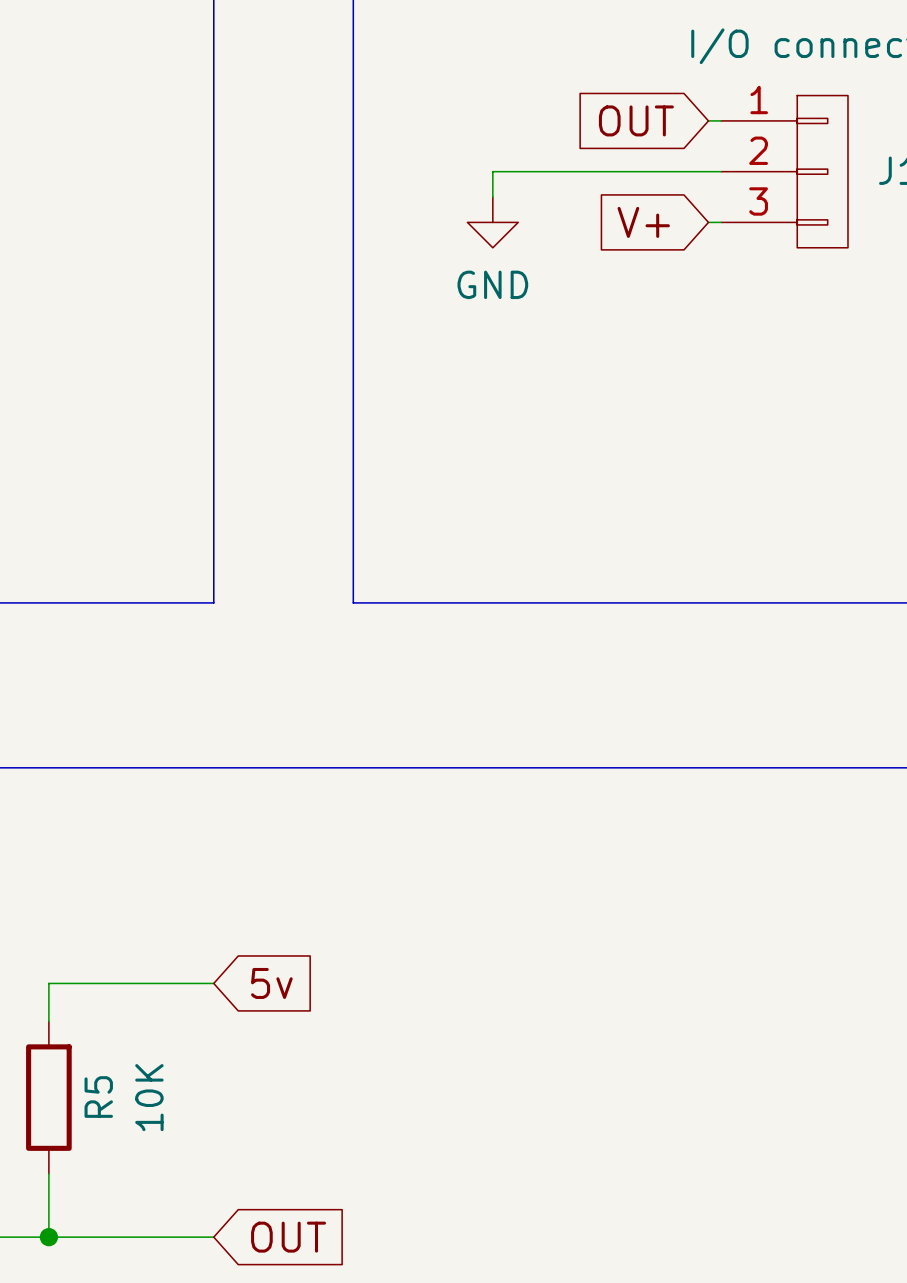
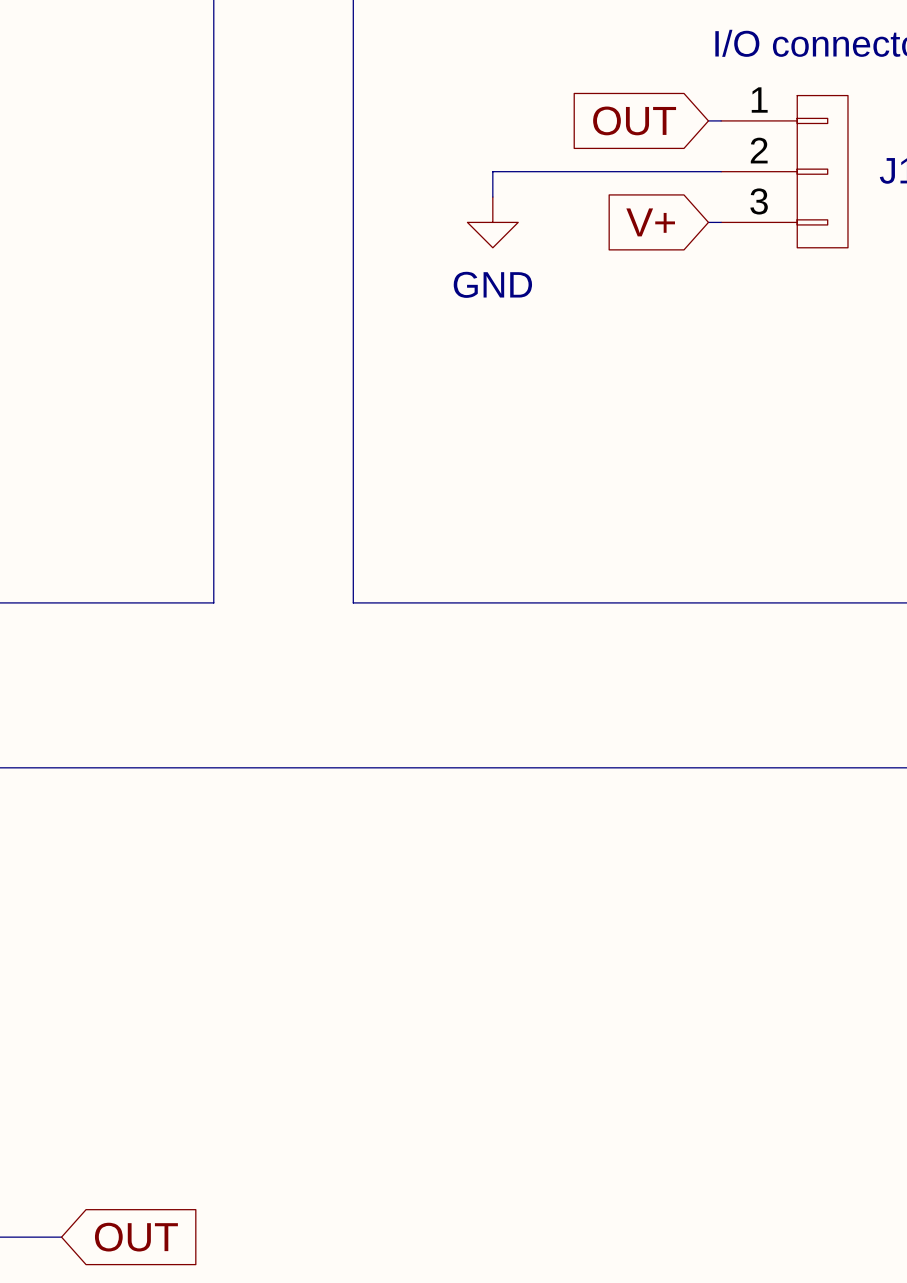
wire: (213, 983) (48, 983) (48, 1021) -> none
global label: 5v (271, 983) -> none
R5: 10K (48, 1097) -> none
wire: (48, 1173) (48, 1237) -> none
junction: (48, 1237) -> none
wire: (61, 1237) (213, 1237) -> none
global label position: OUT (288, 1237) -> OUT (136, 1237)

